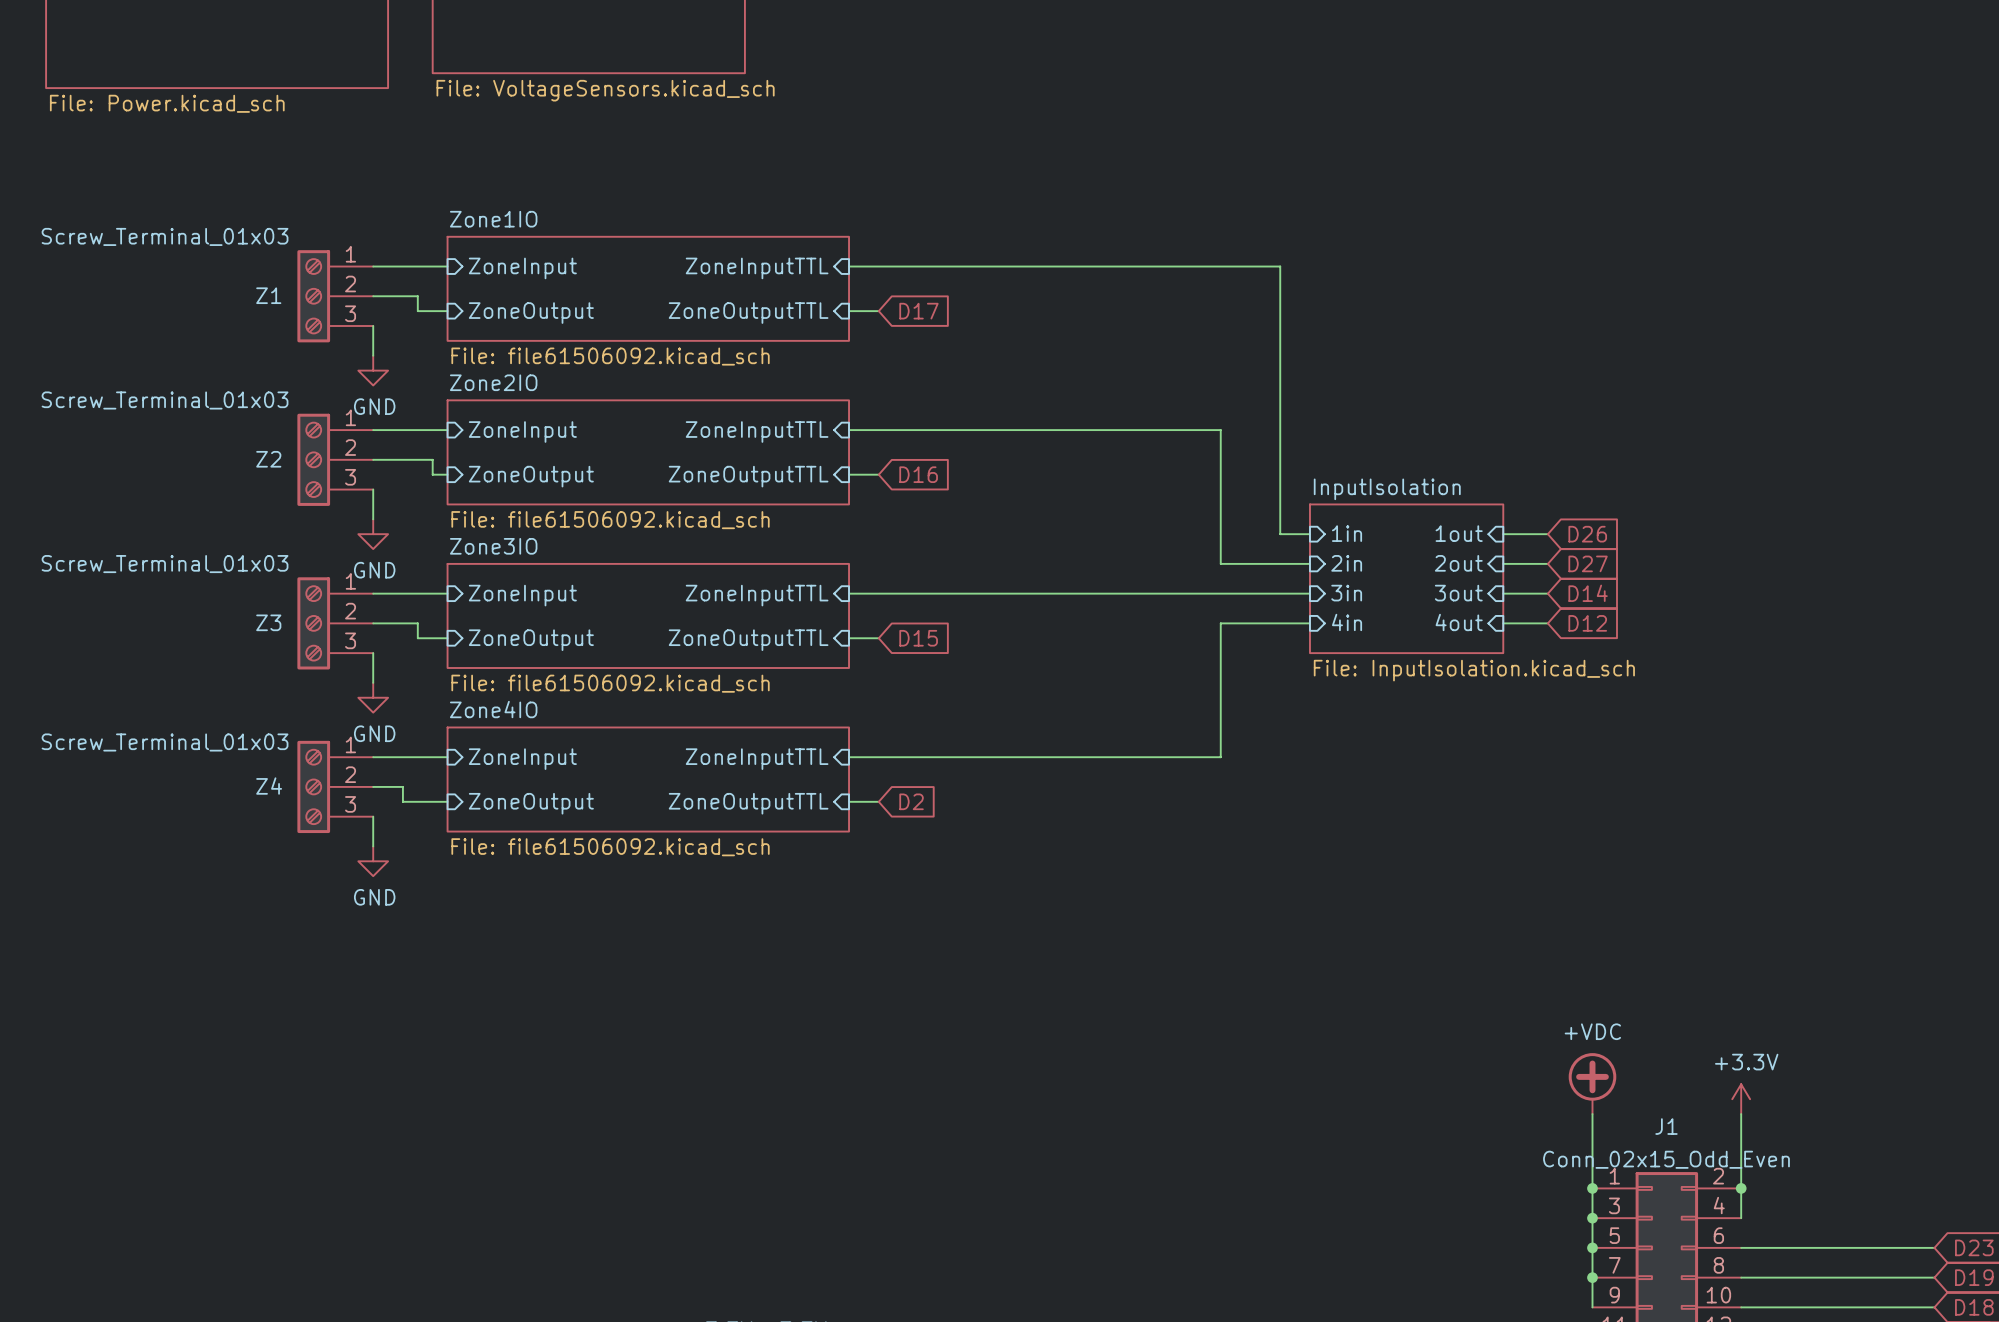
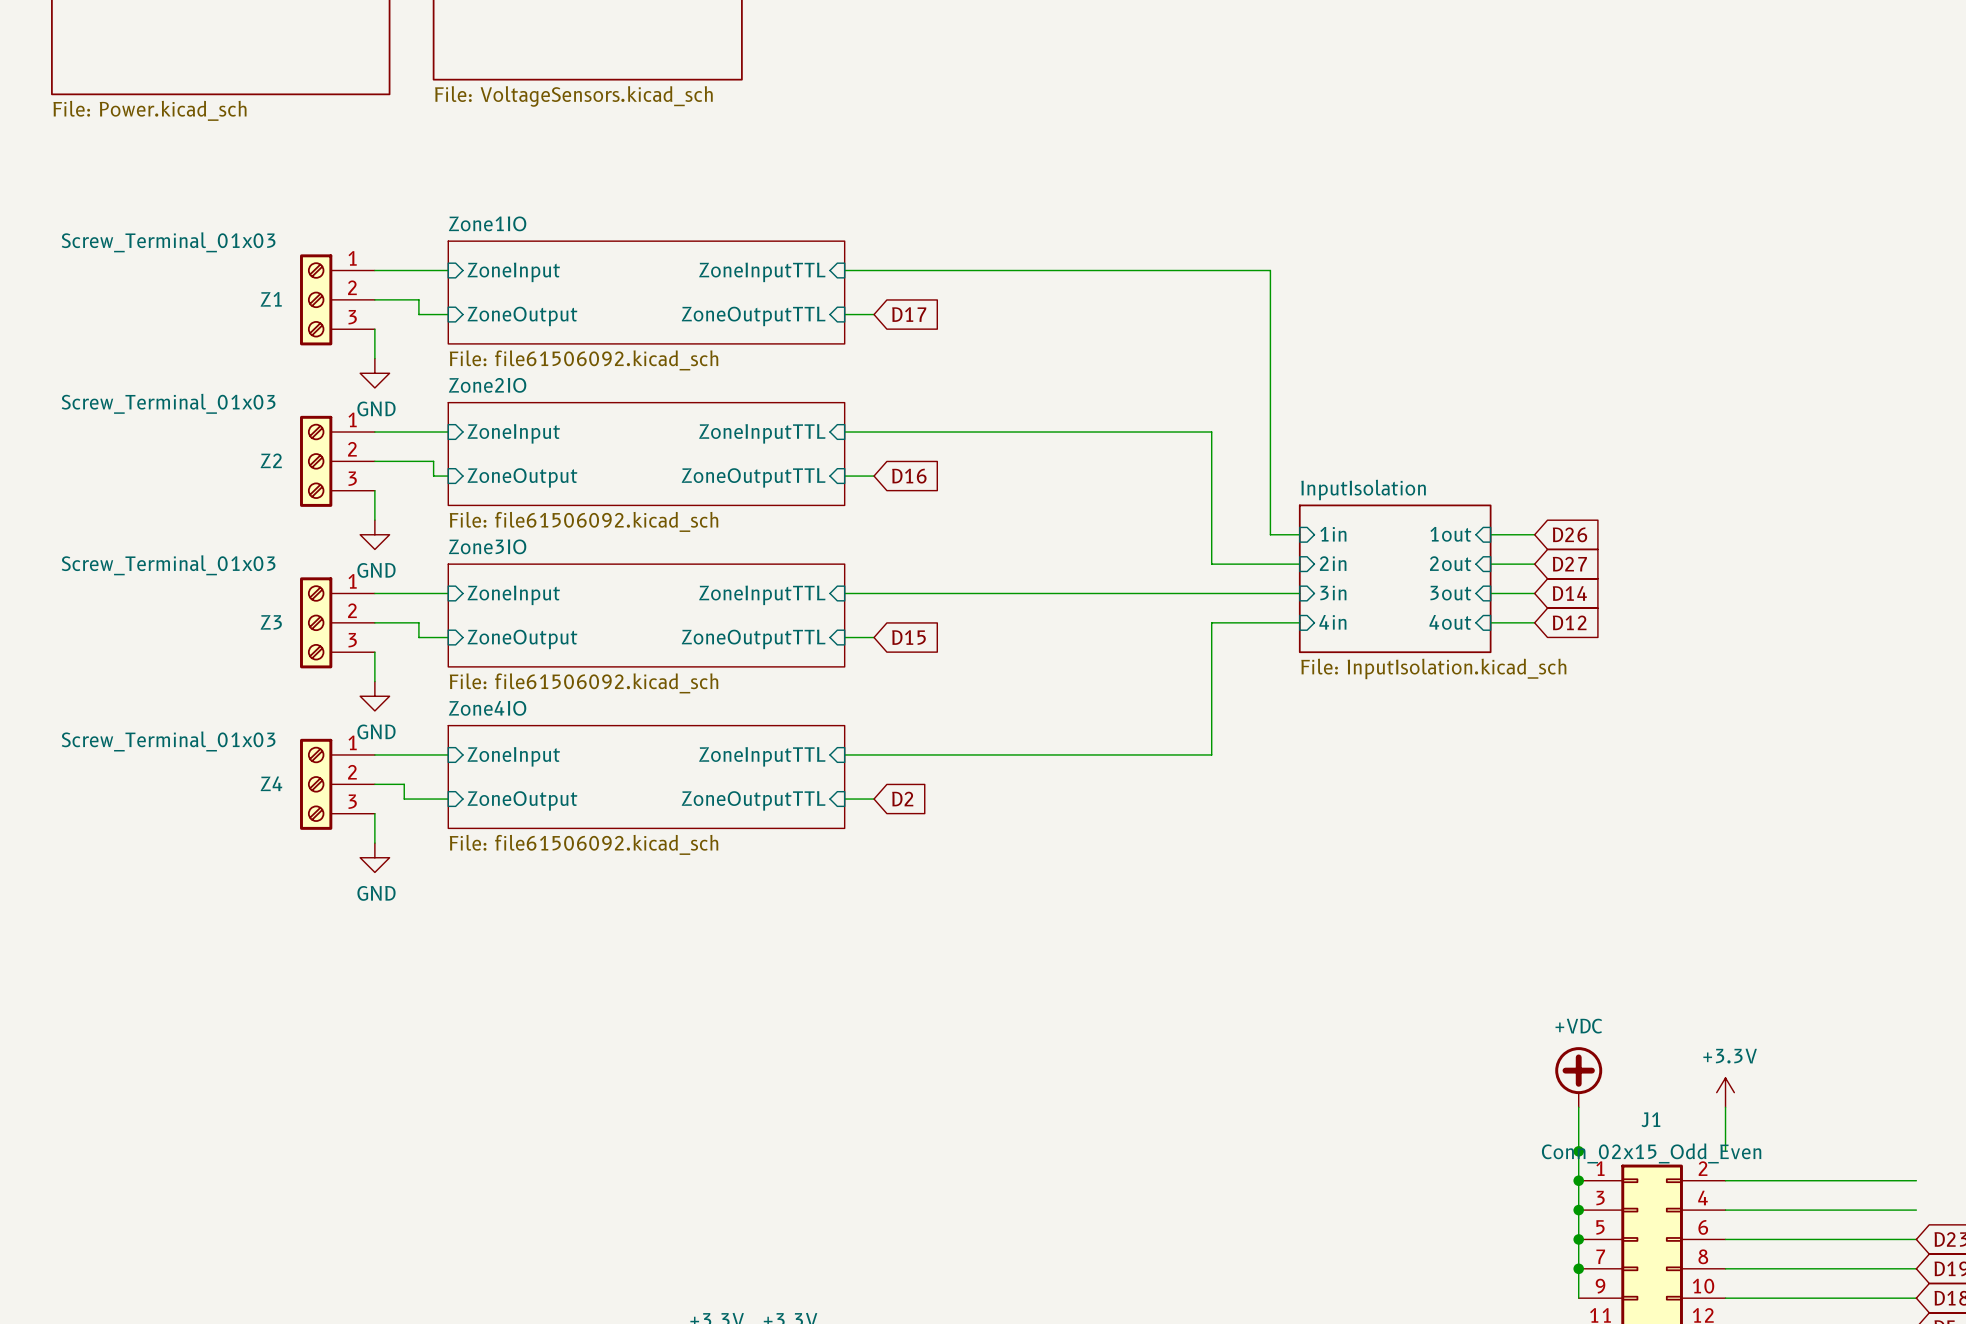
junction: none -> (1578, 1151)
wire: (1741, 1158) (1741, 1218) -> (1916, 1210) (1725, 1210)
wire: none -> (1725, 1180) (1916, 1180)
junction: (1741, 1188) -> none

